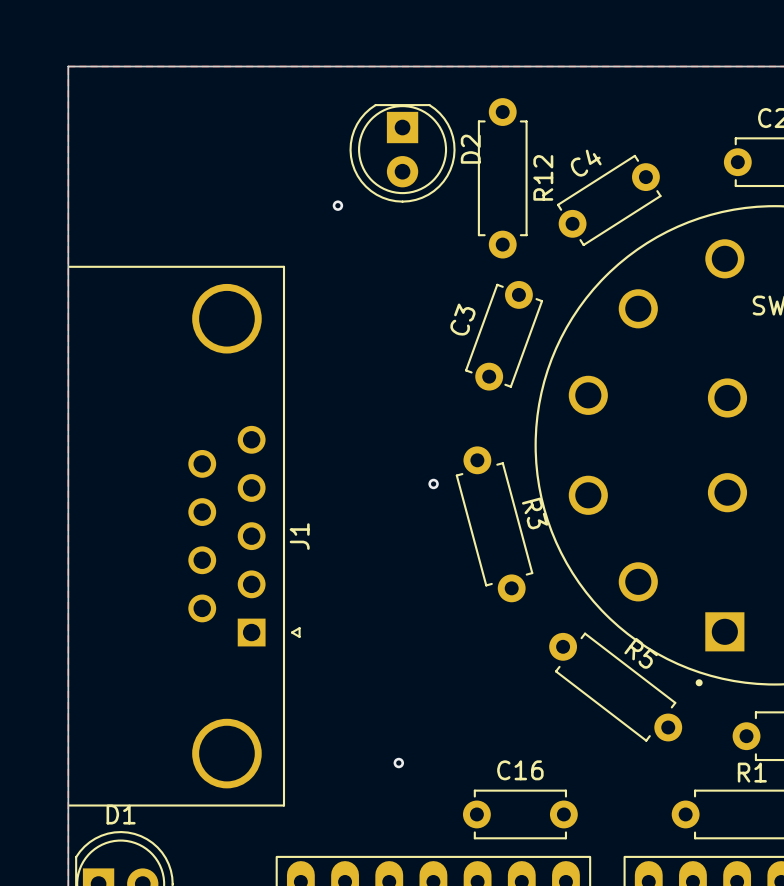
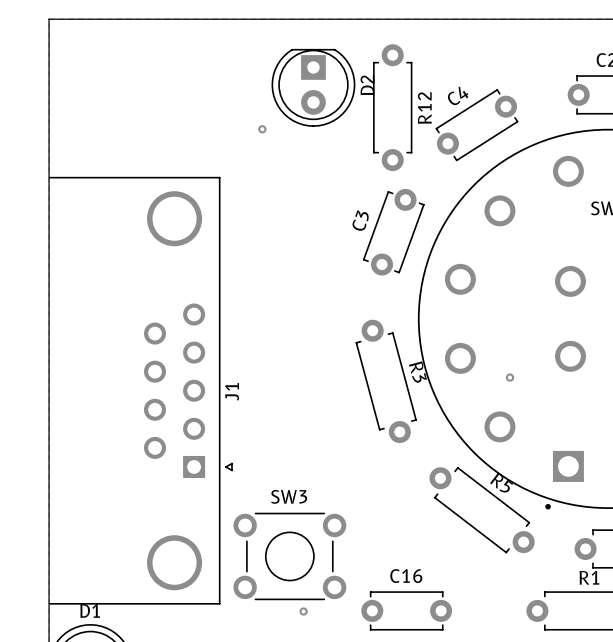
via: (433, 483) -> none
via: none -> (510, 377)
SW3: none -> (289, 556)
via position: (398, 763) -> (303, 611)

